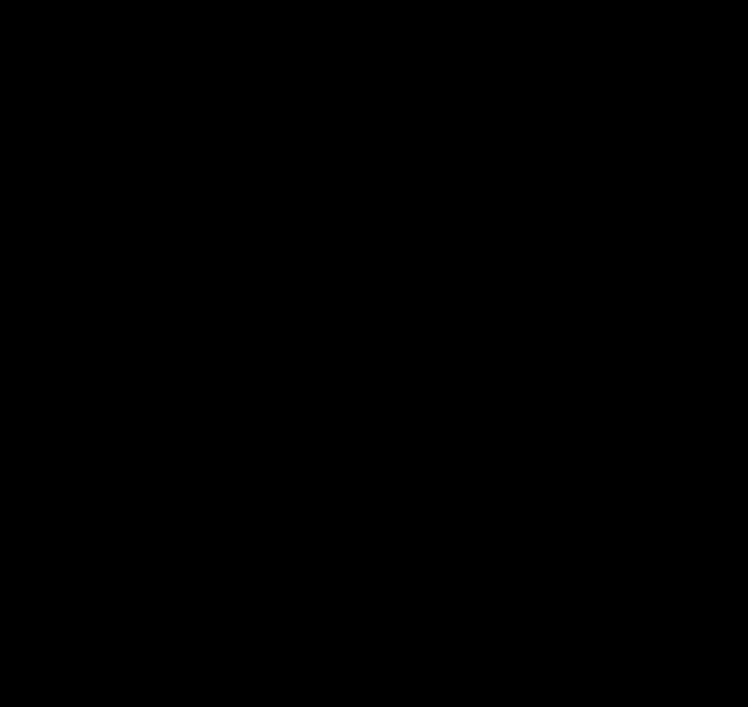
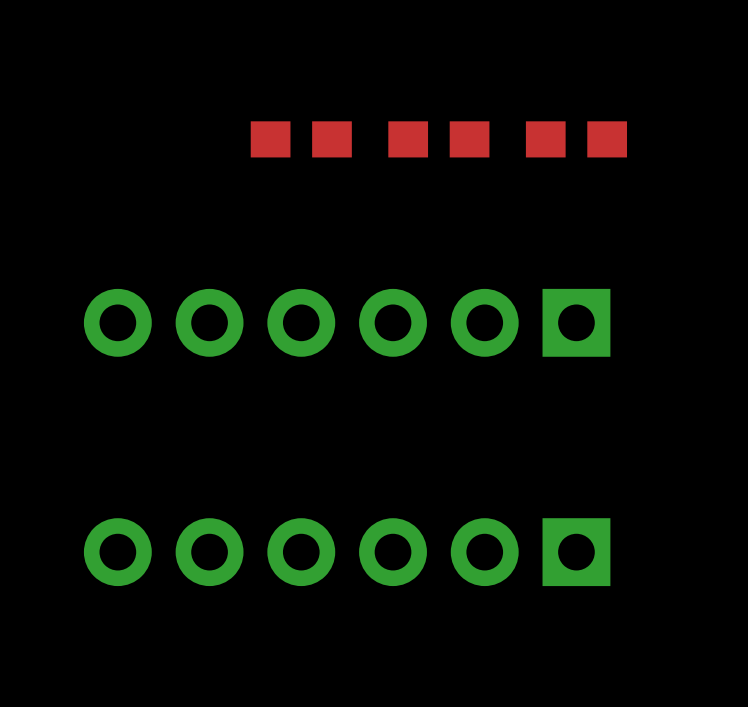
part: none -> (301, 139)
part: none -> (438, 139)
part: none -> (576, 139)
part: none -> (347, 322)
part: none -> (347, 552)

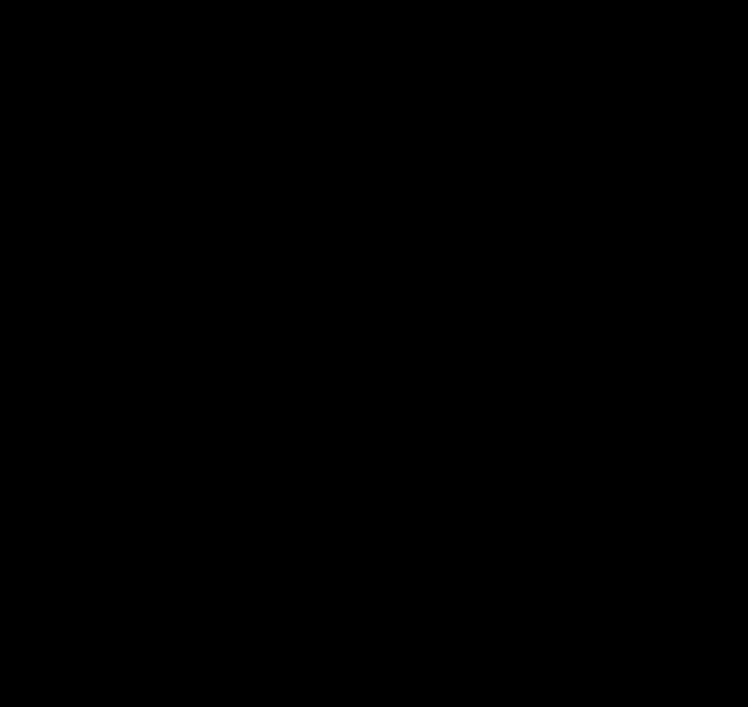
part: (301, 139) -> none
part: (438, 139) -> none
part: (576, 139) -> none
part: (347, 322) -> none
part: (347, 552) -> none

